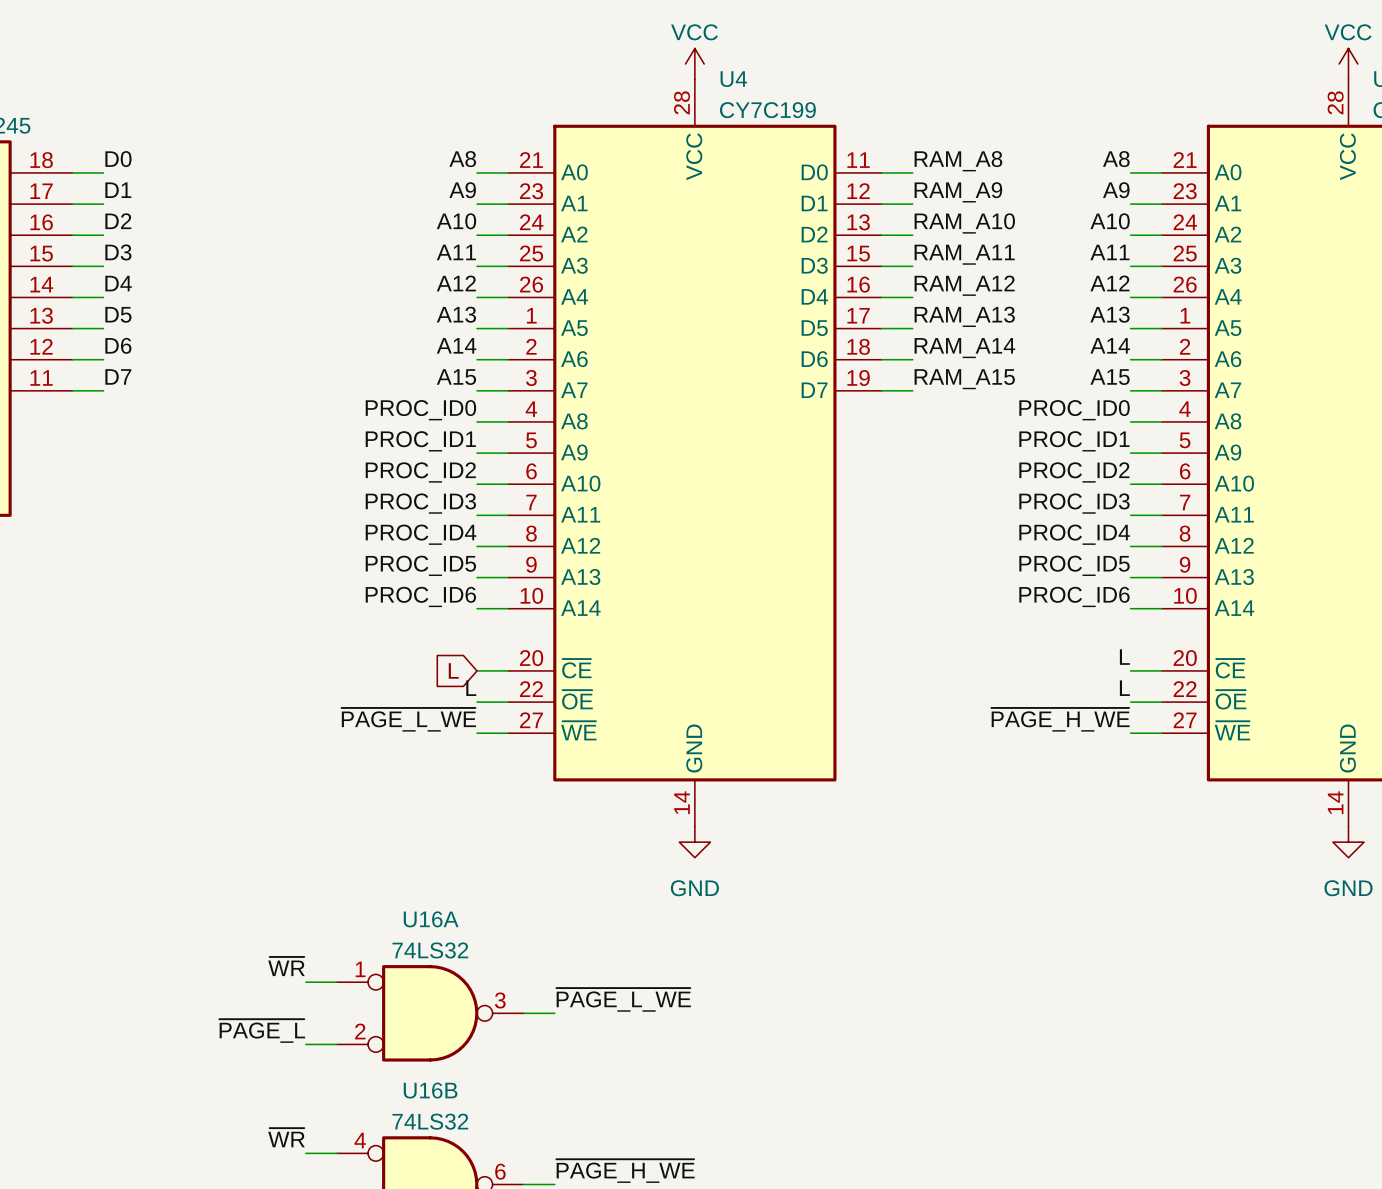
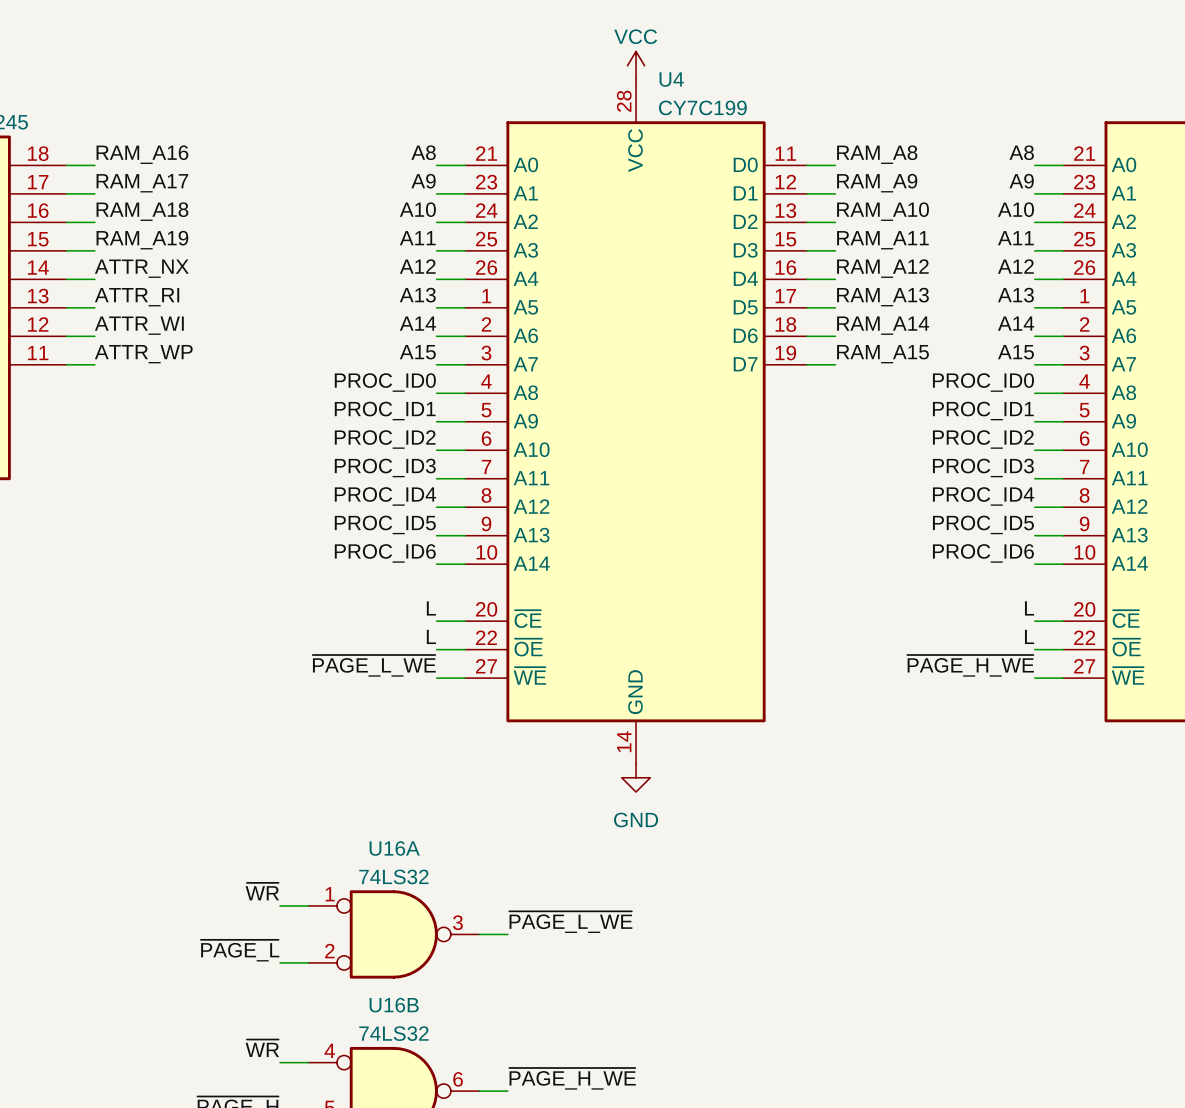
label: D0 (118, 159) -> RAM_A16 (142, 154)
label: D1 (118, 190) -> RAM_A17 (142, 183)
label: D2 (118, 221) -> RAM_A18 (142, 211)
label: D3 (118, 252) -> RAM_A19 (142, 240)
label: D4 (118, 283) -> ATTR_NX (141, 268)
label: D5 (118, 314) -> ATTR_RI (137, 297)
label: D6 (118, 345) -> ATTR_WI (139, 325)
label: D7 (118, 376) -> ATTR_WP (143, 354)
label: none -> L (431, 608)
global label: L (453, 670) -> none

